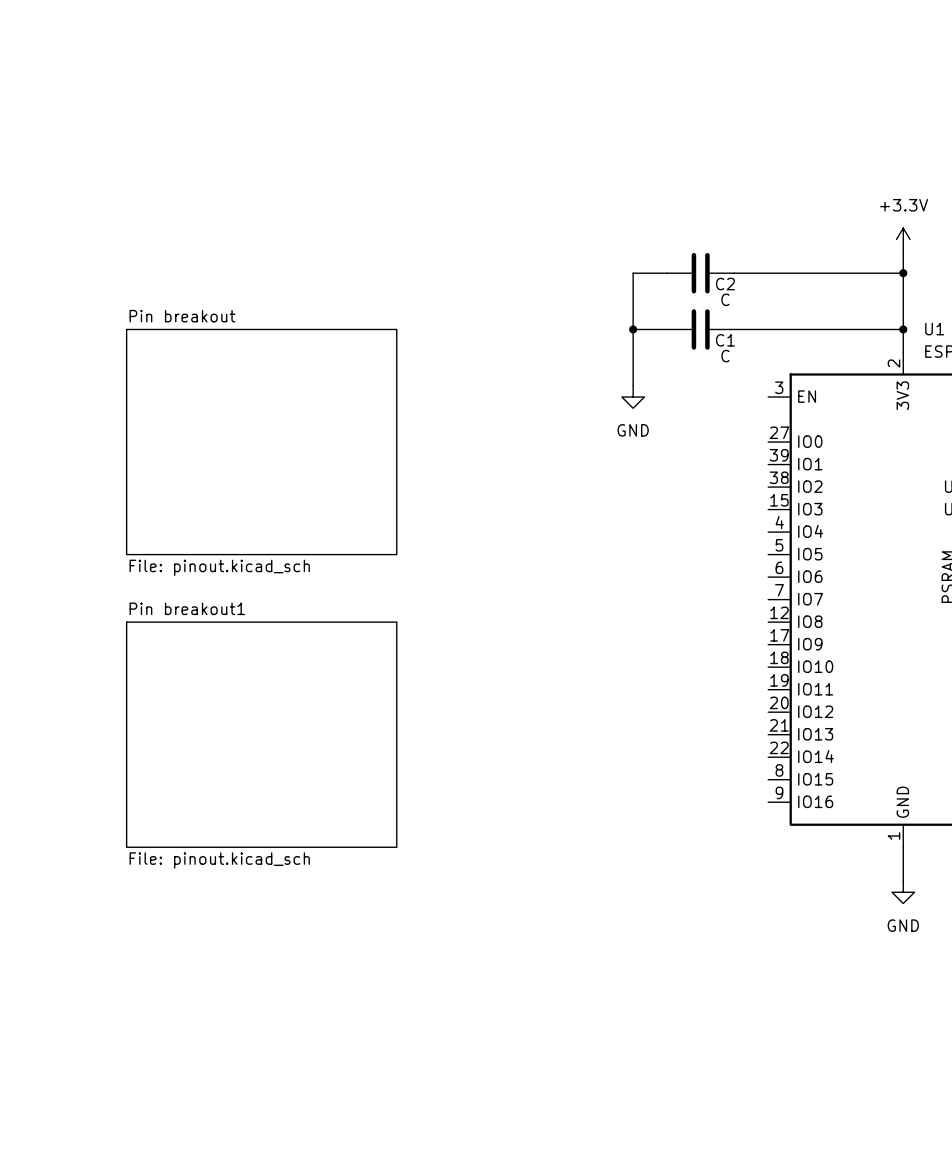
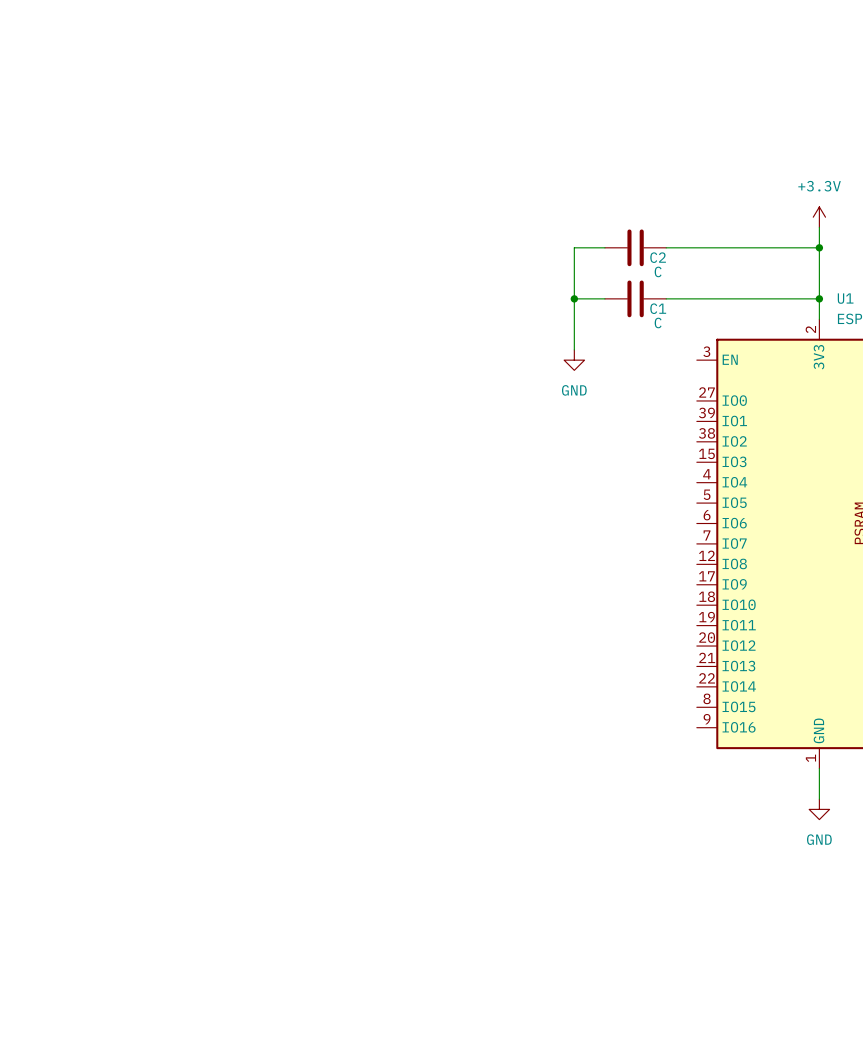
sheet Pin breakout: File: pinout.kicad_sch (261, 442) -> none
sheet Pin breakout1: File: pinout.kicad_sch (261, 734) -> none

